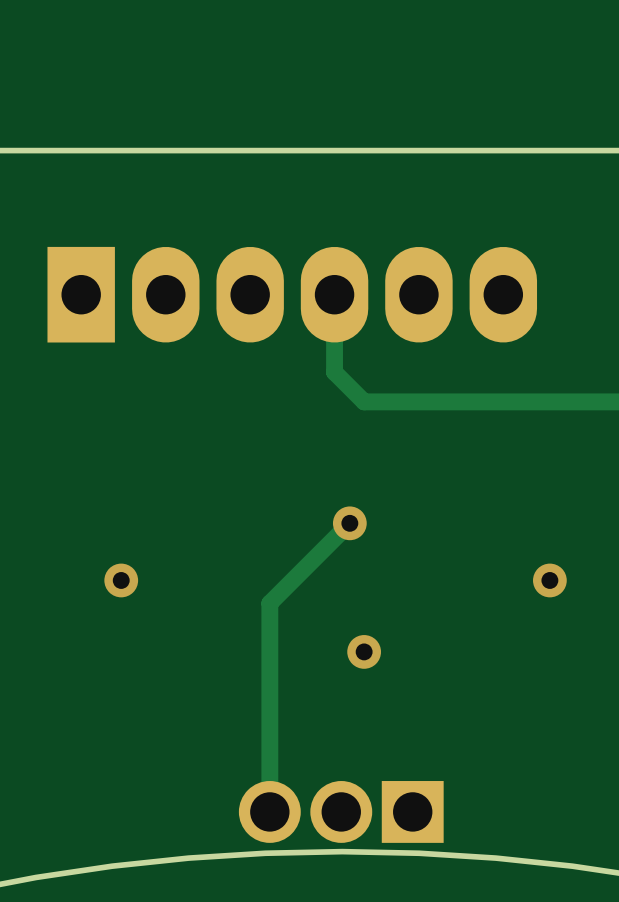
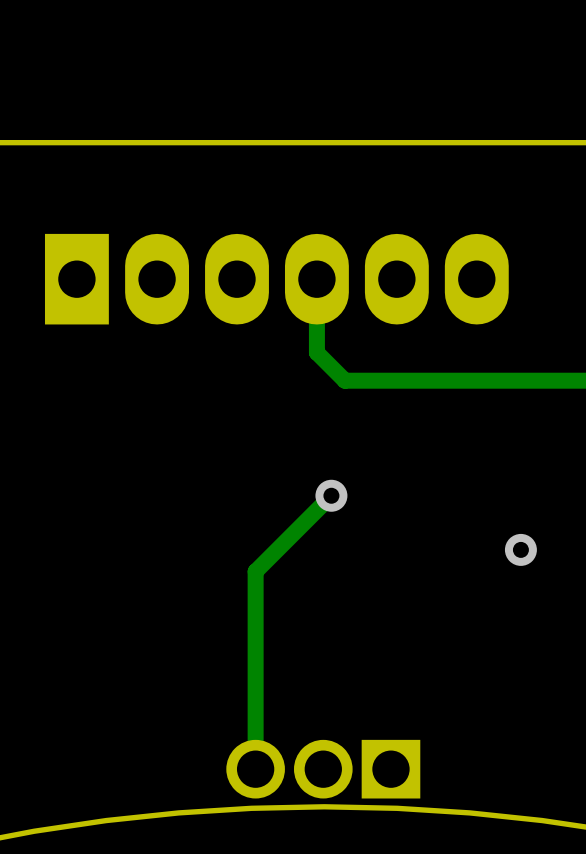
via: (121, 580) -> none
via: (364, 651) -> none

